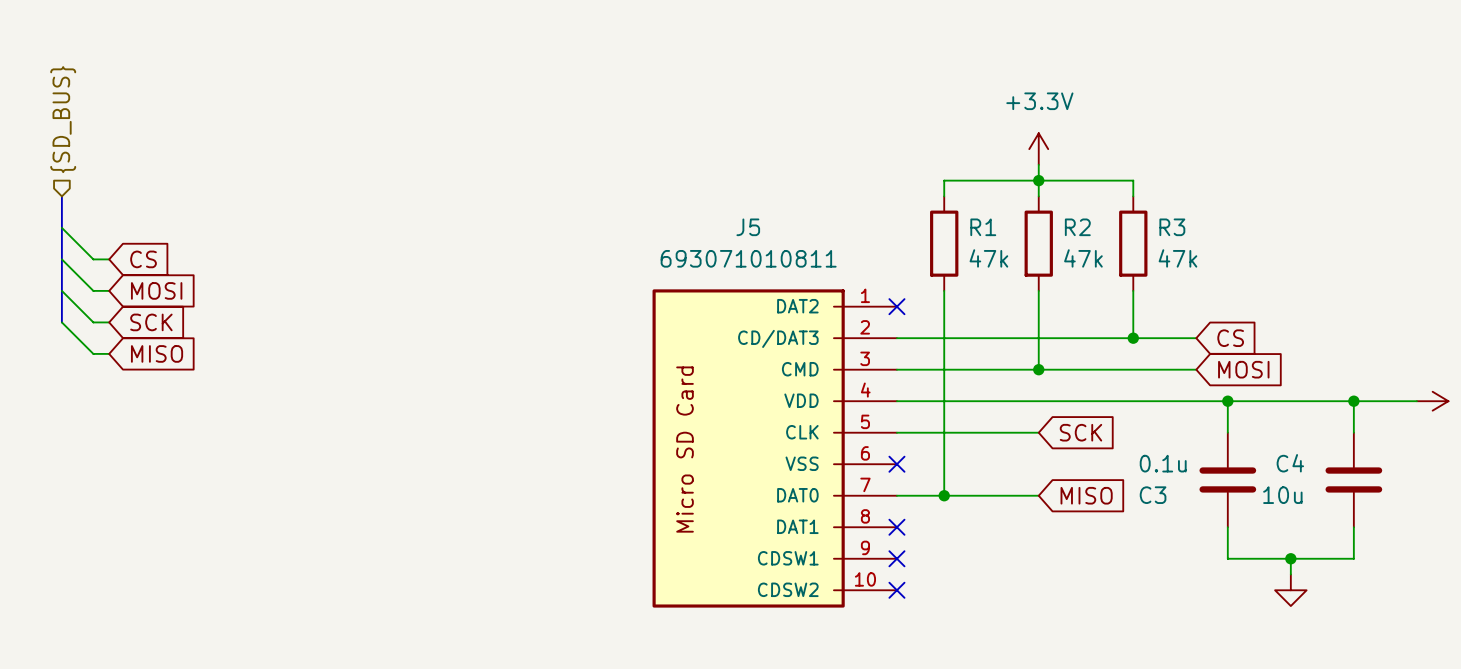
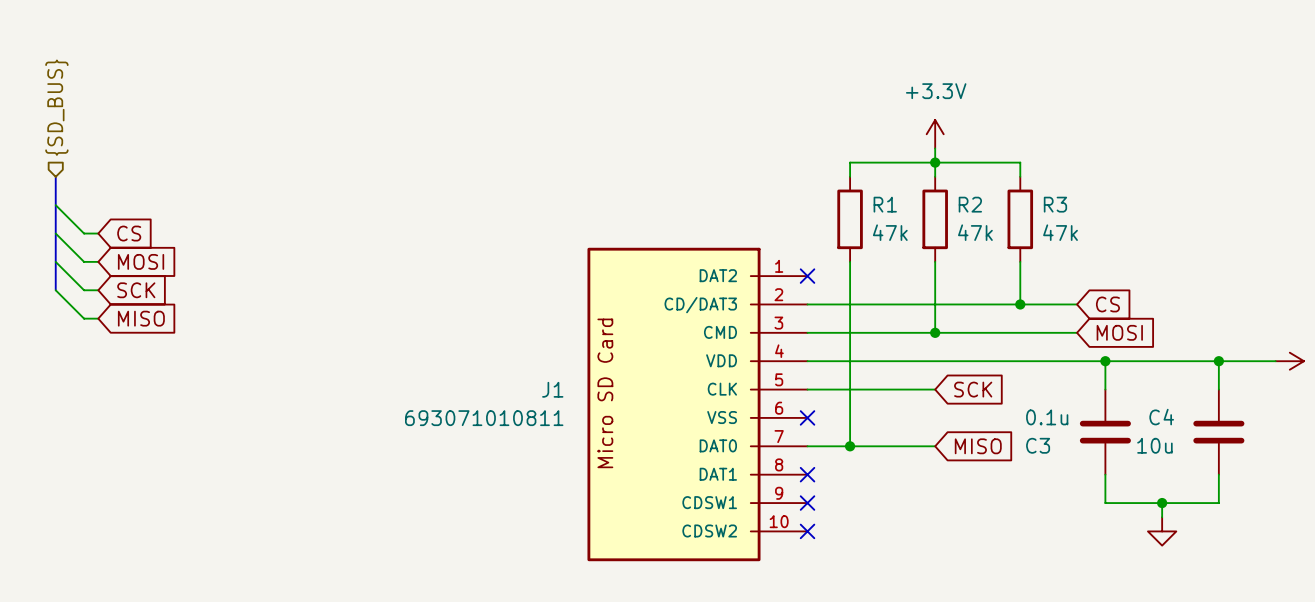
J5: 693071010811 (774, 448) -> none
J1: none -> 693071010811 (697, 404)

